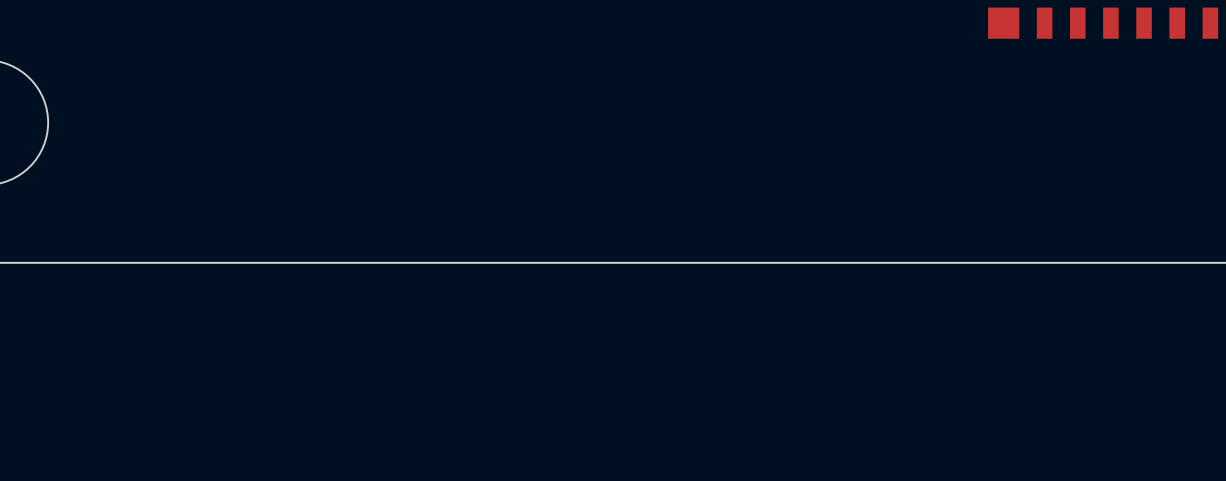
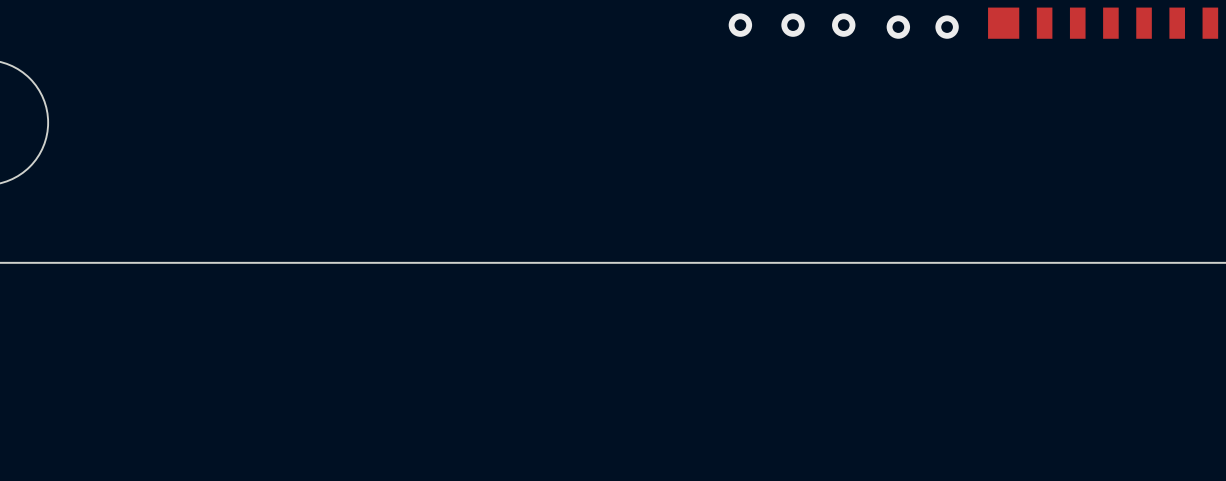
via: none -> (740, 25)
via: none -> (793, 25)
via: none -> (843, 25)
via: none -> (898, 27)
via: none -> (947, 27)

